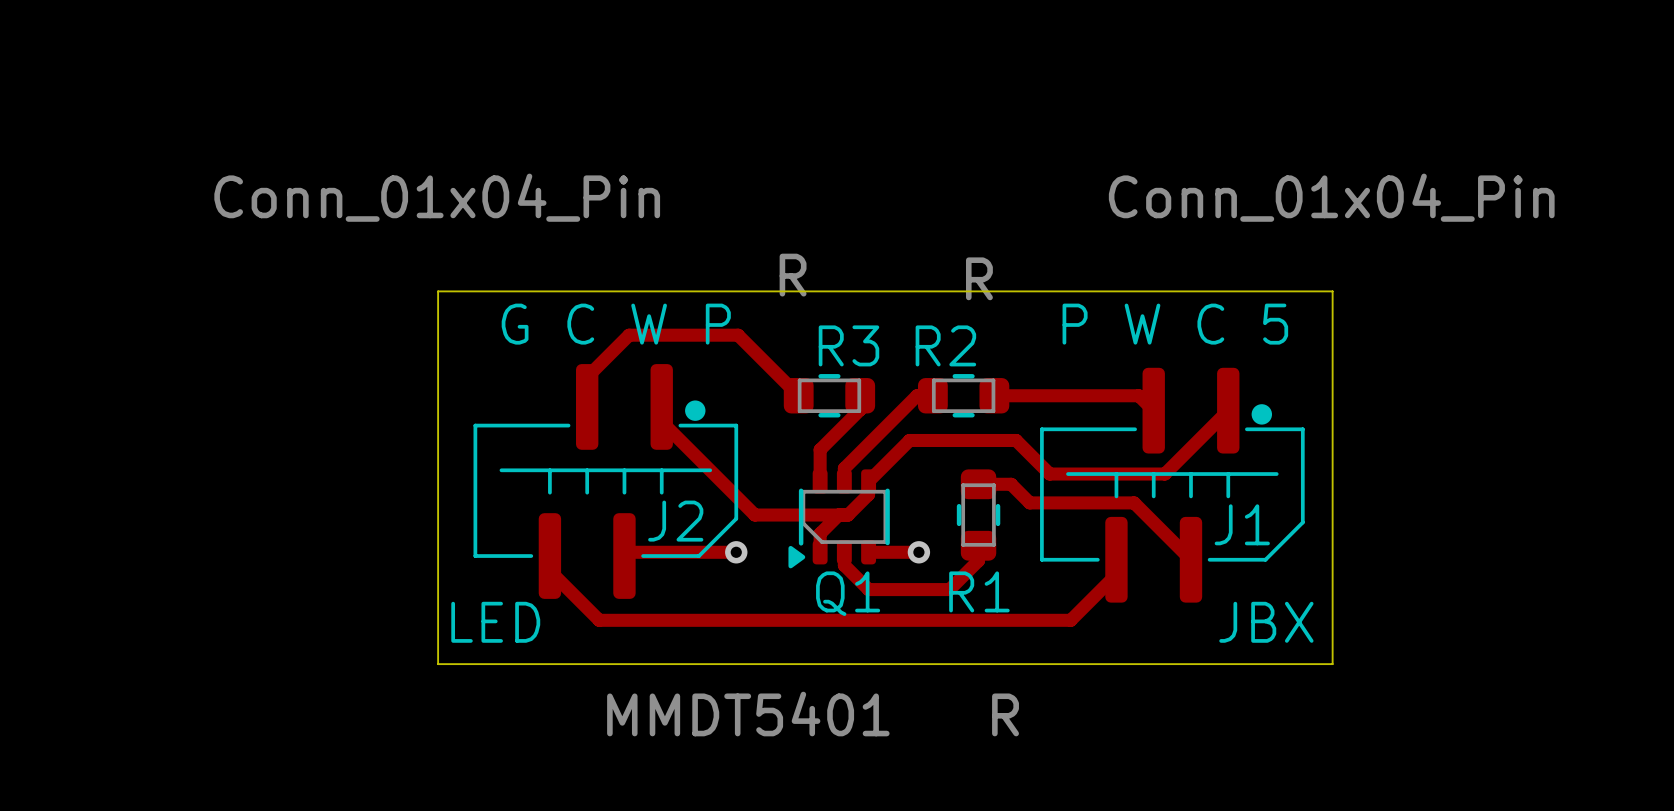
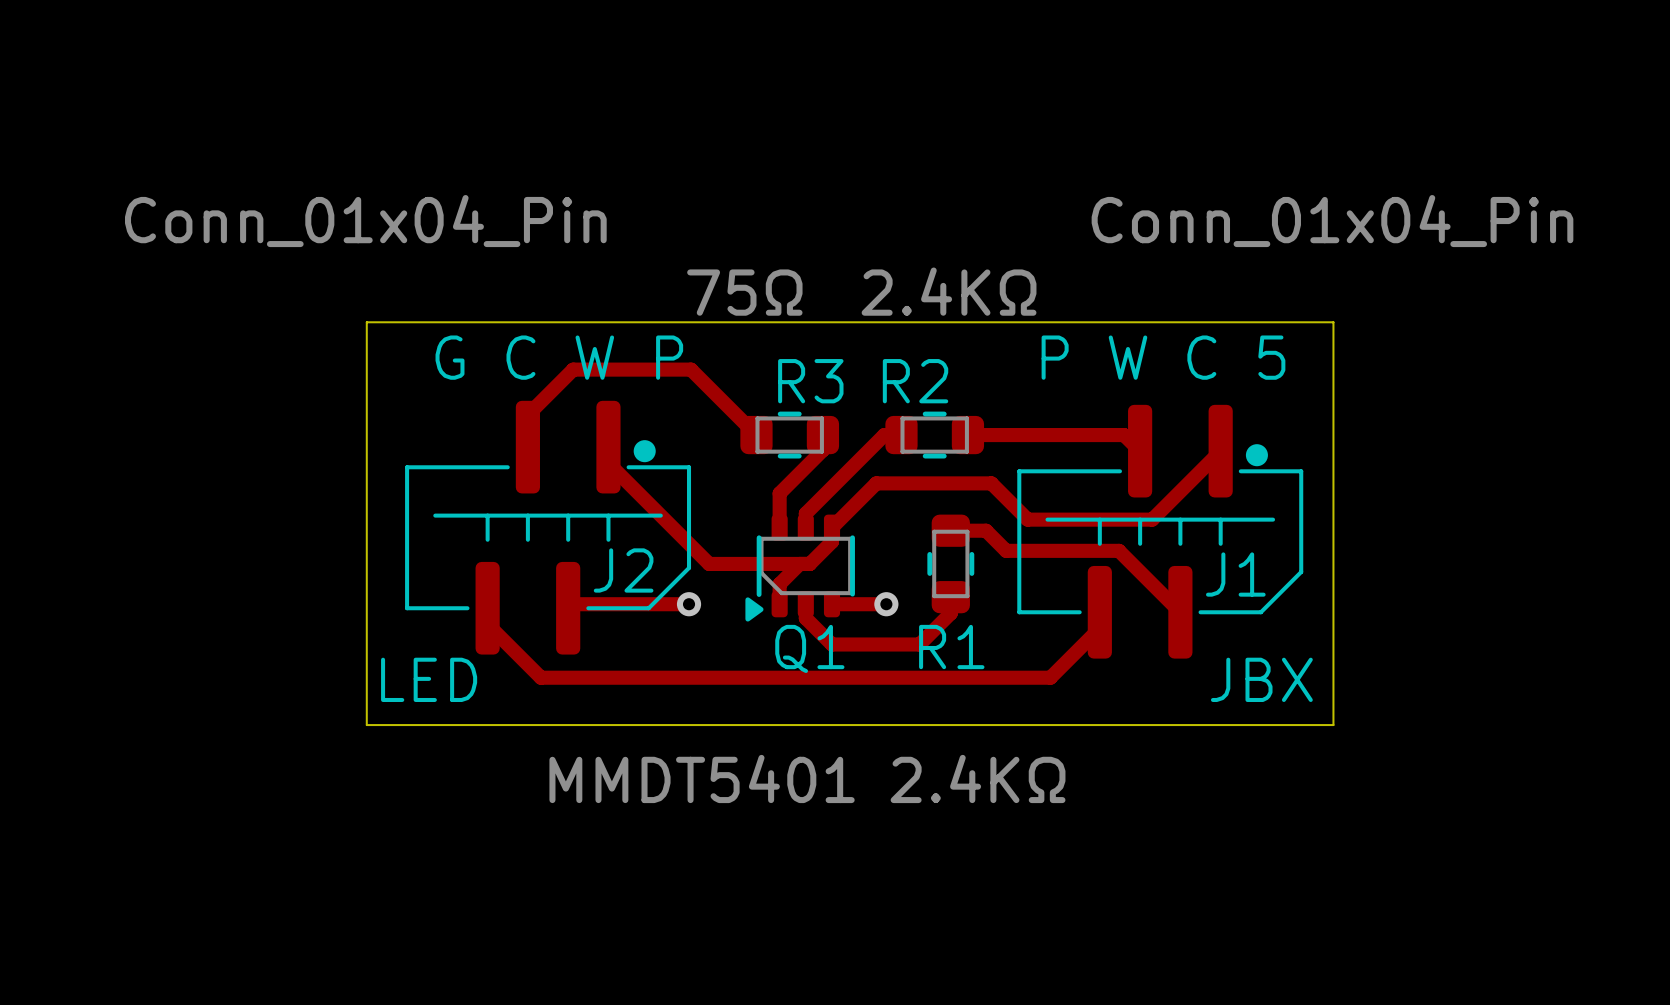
R3 value: R (793, 275) -> 75Ω (744, 292)
R2 value: R (979, 278) -> 2.4KΩ (949, 291)
R1 value: R (1005, 714) -> 2.4KΩ (978, 778)

